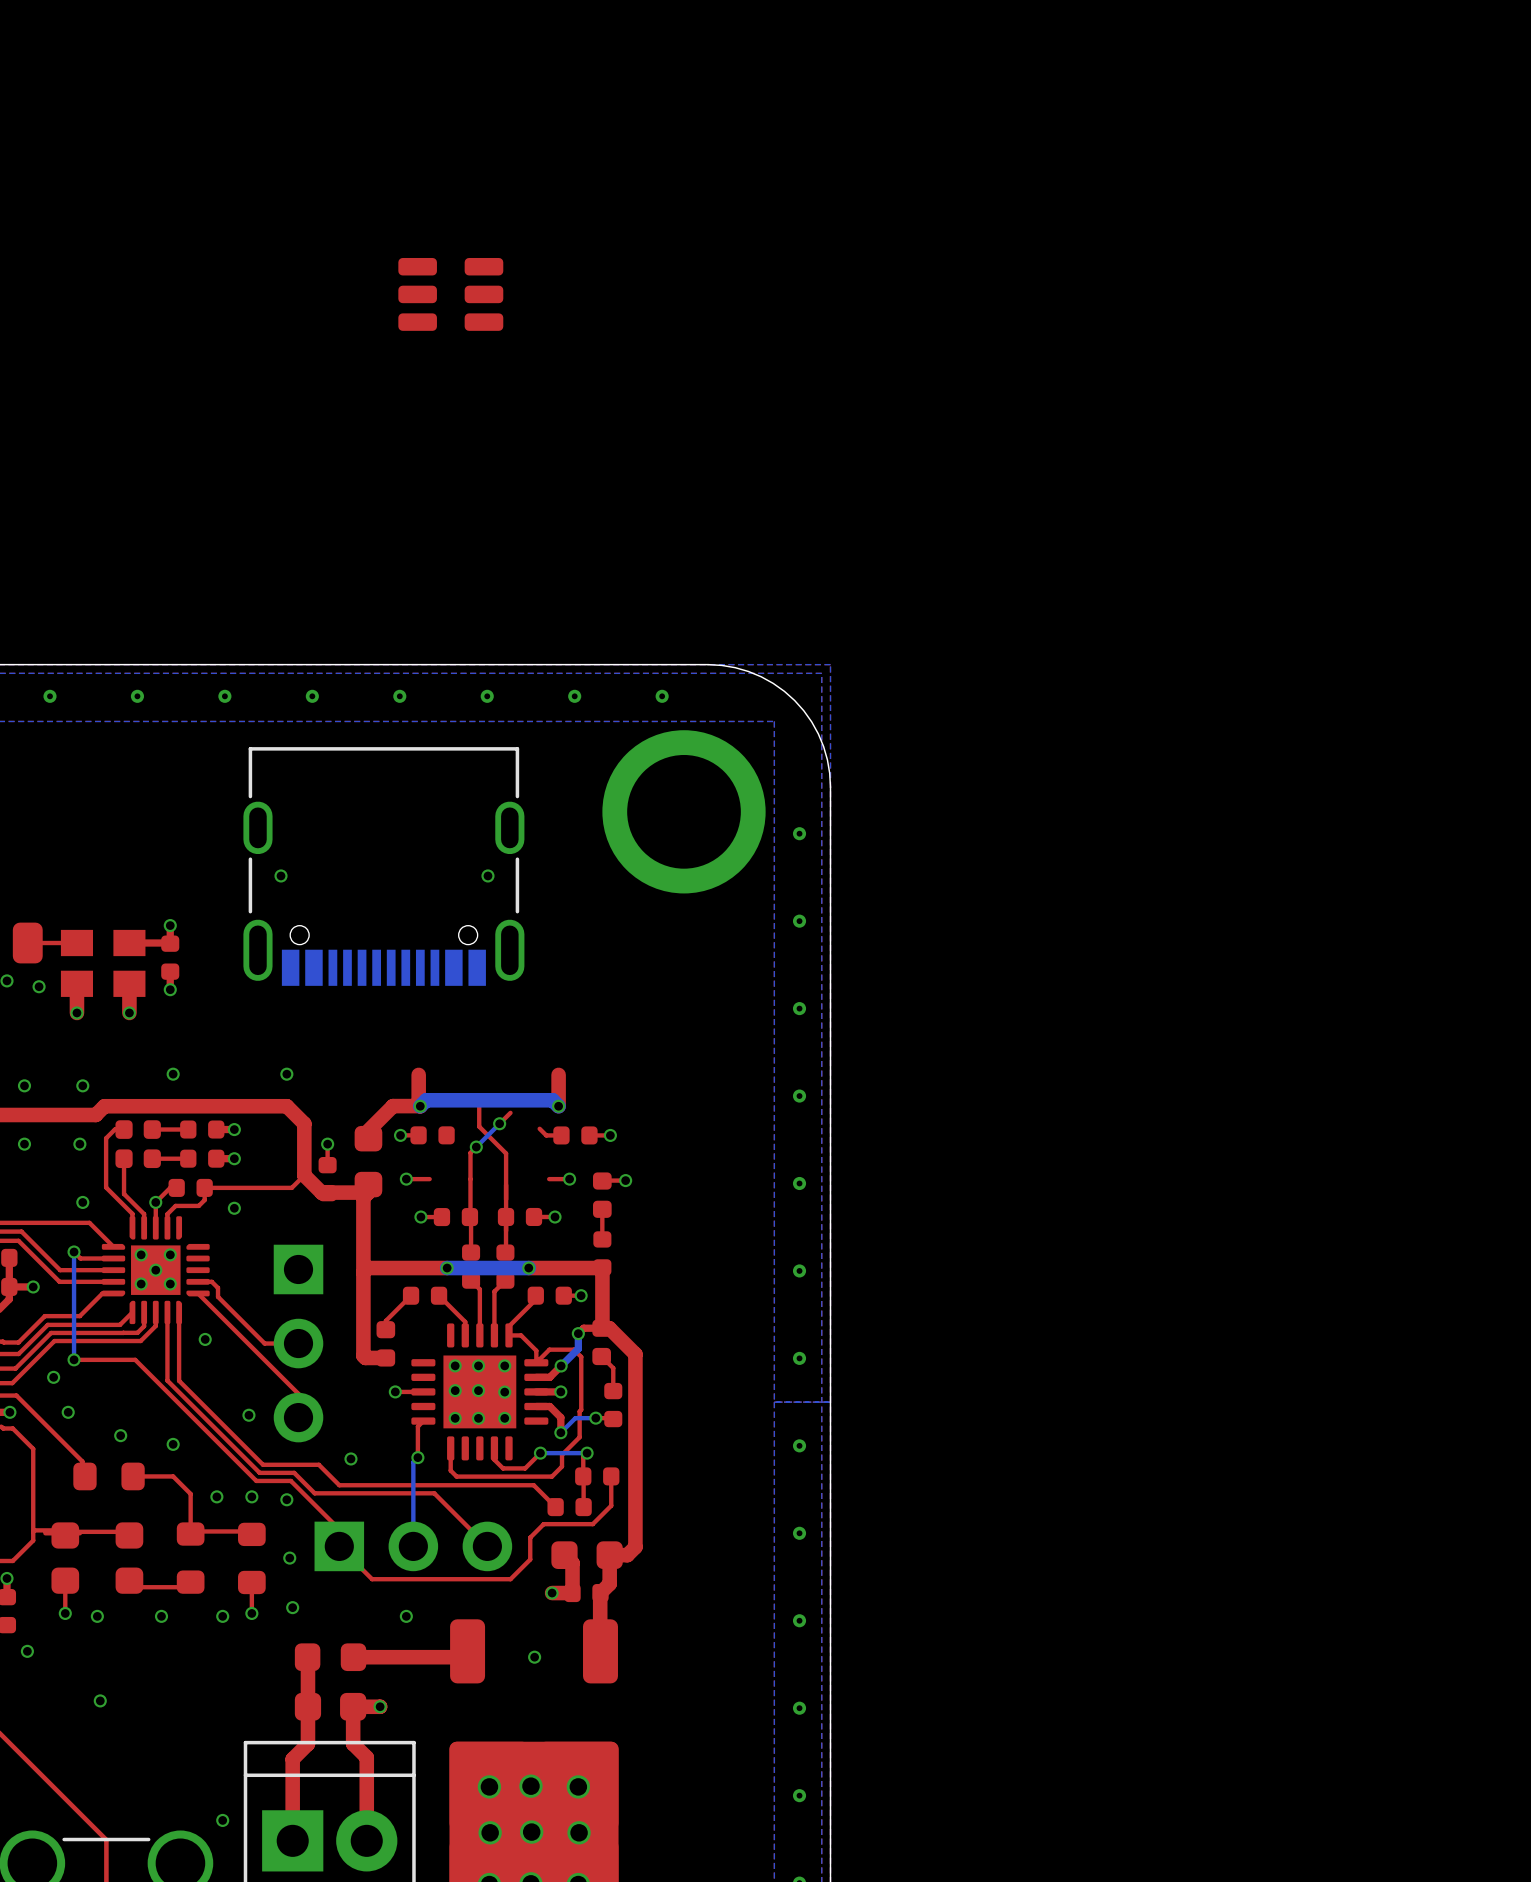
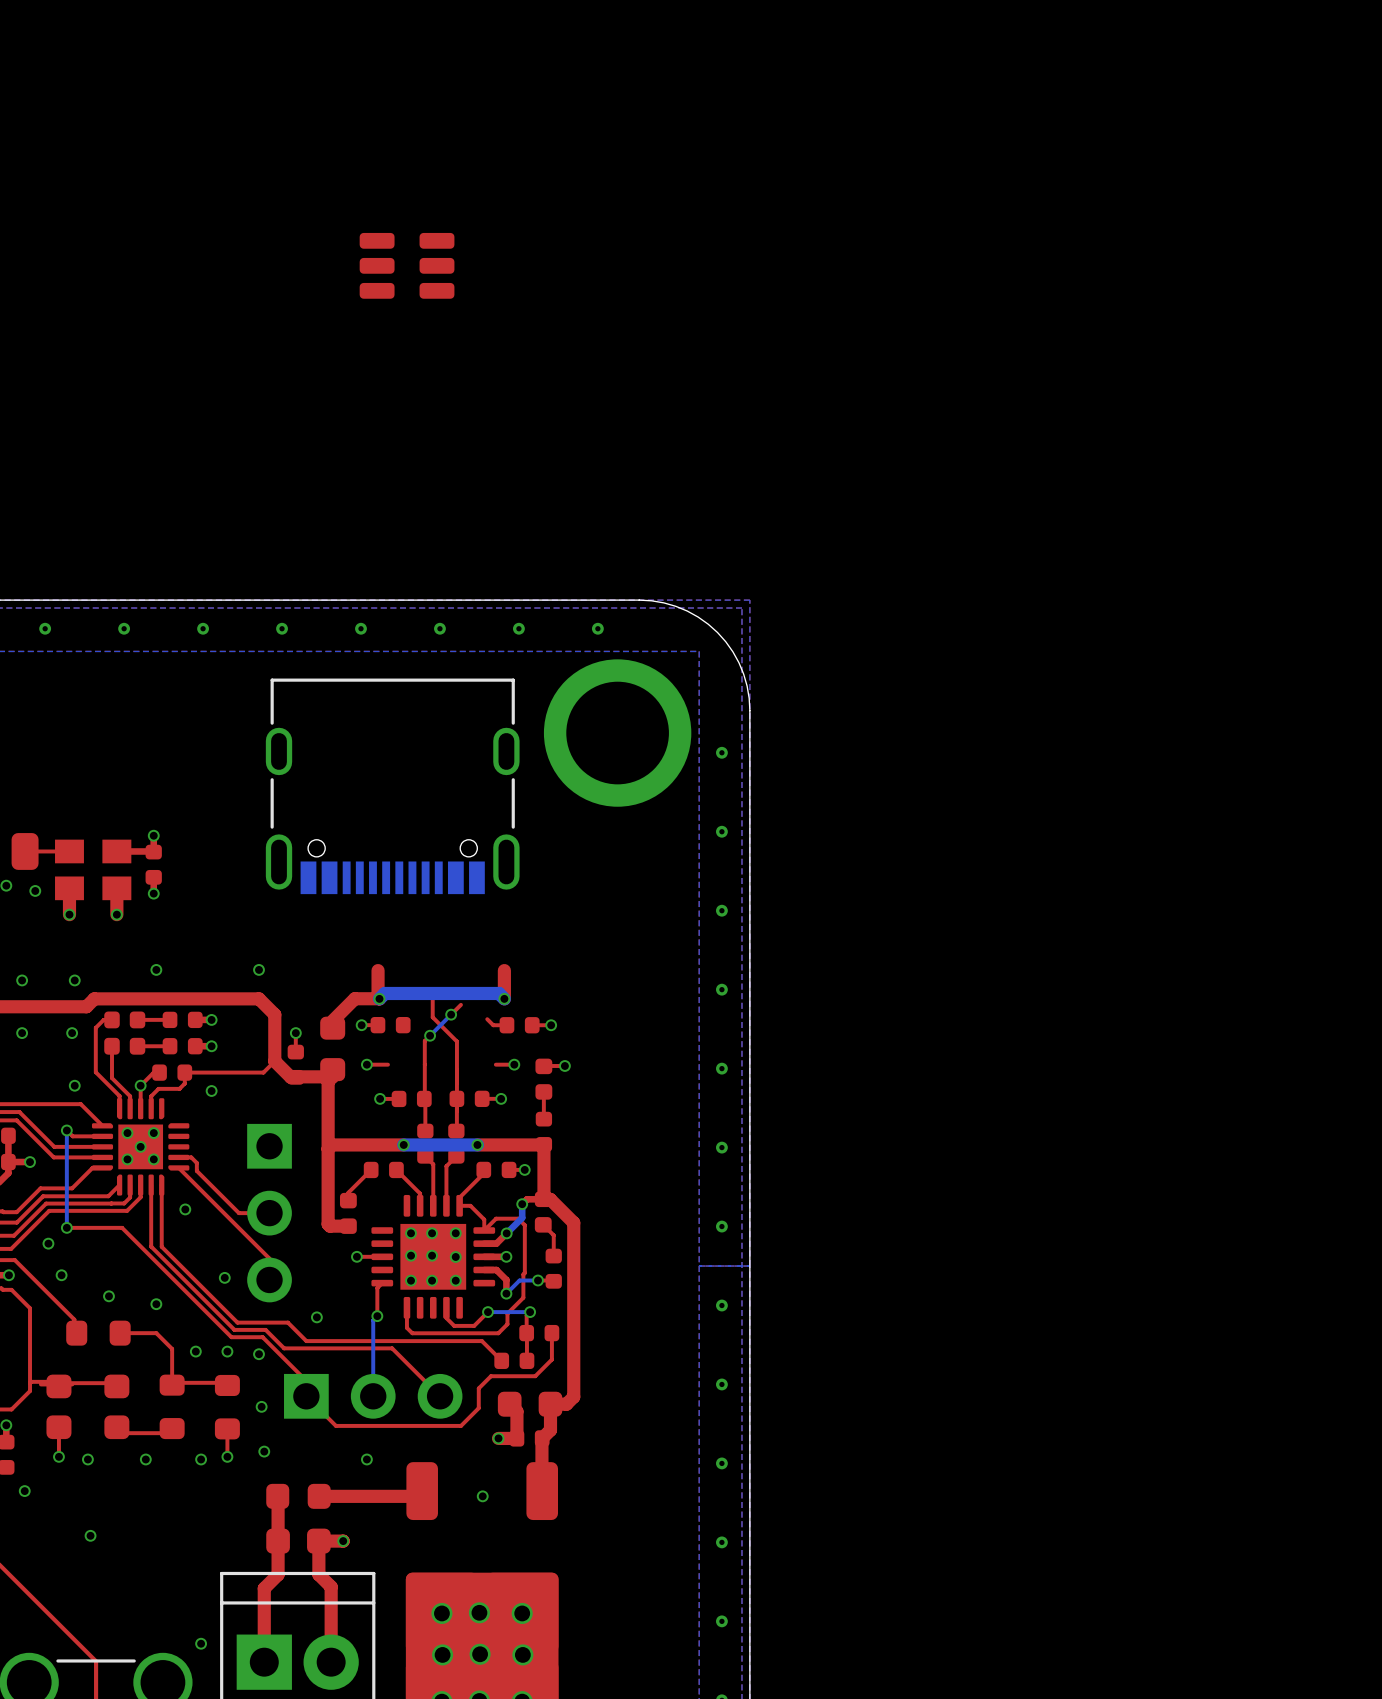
part position: (383, 866) -> (392, 786)
via: (281, 875) -> none
via: (487, 875) -> none

